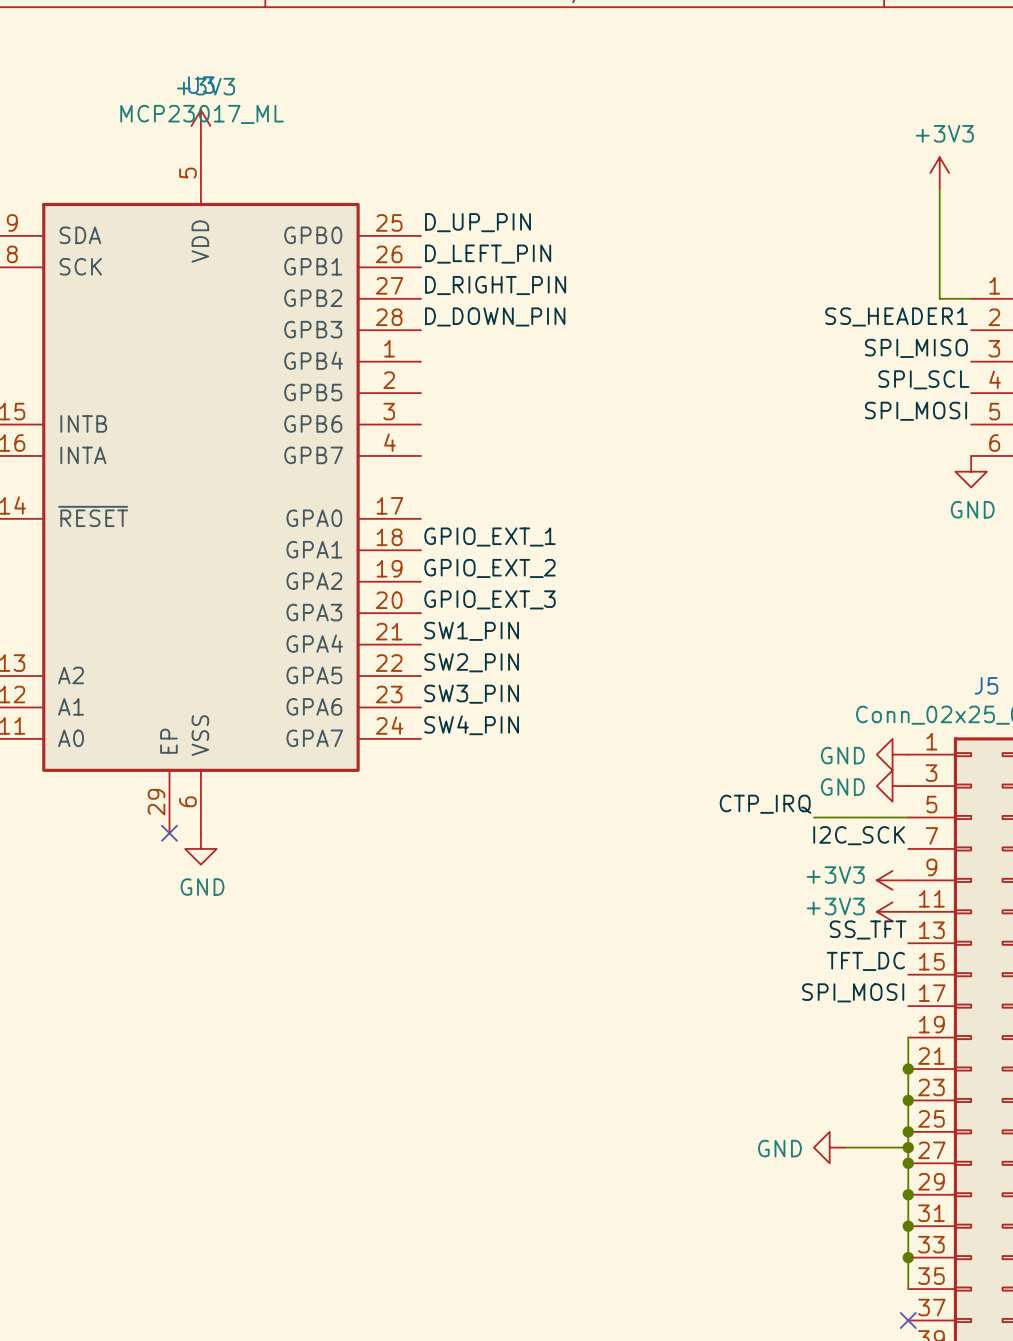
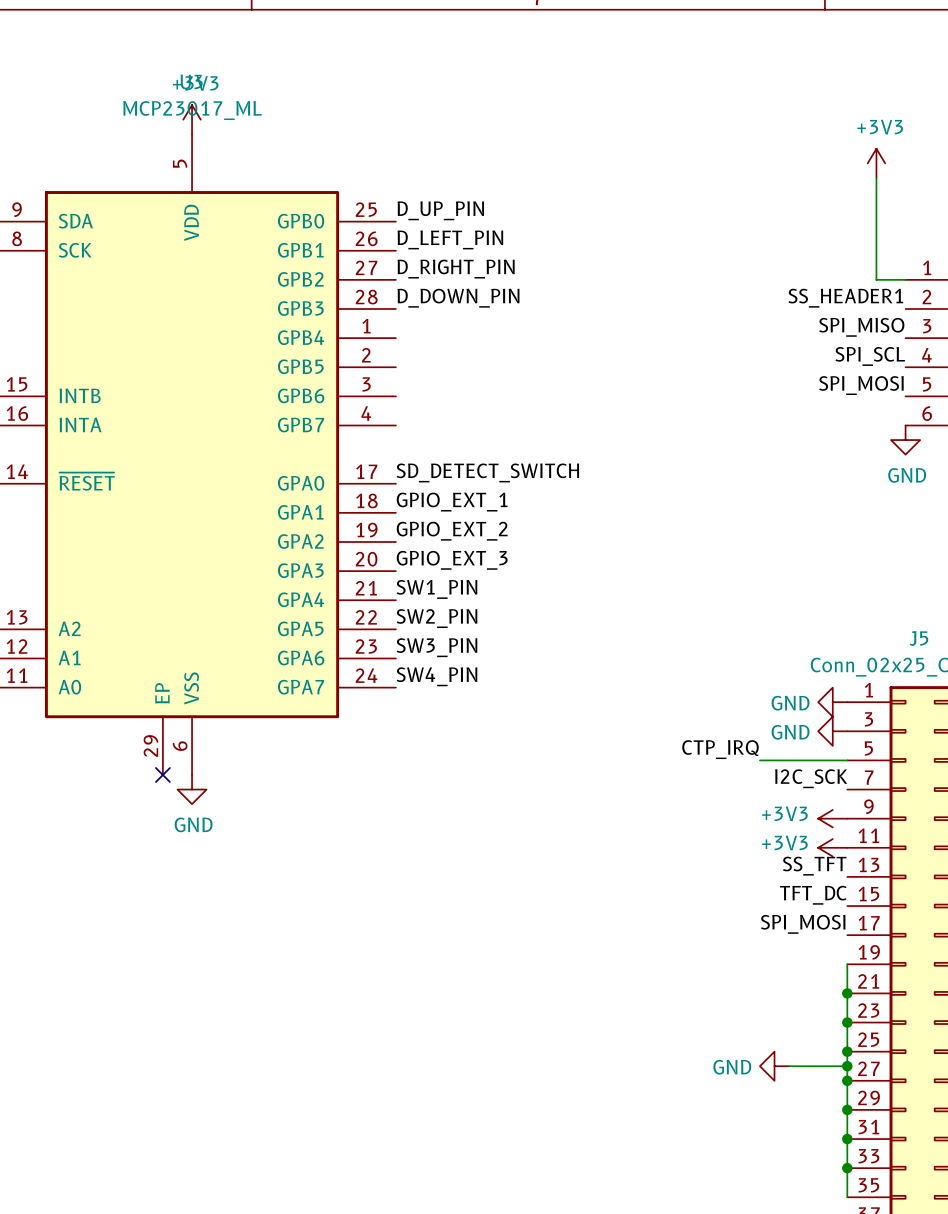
label: none -> SD_DETECT_SWITCH (487, 472)

